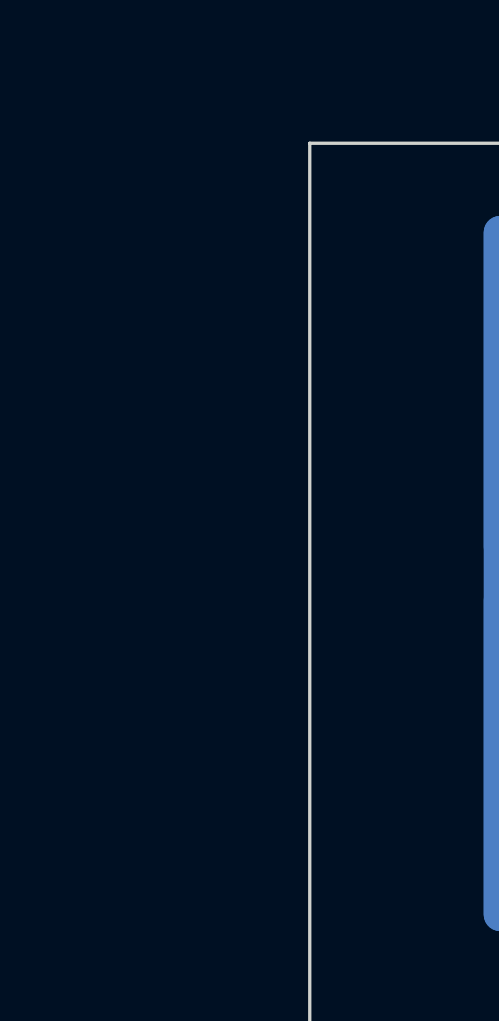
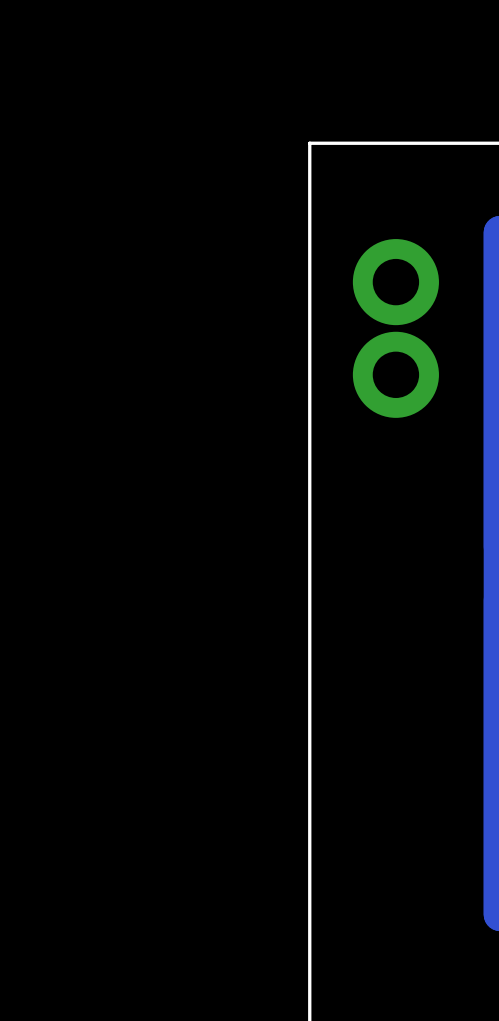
via: none -> (395, 282)
via: none -> (395, 374)

